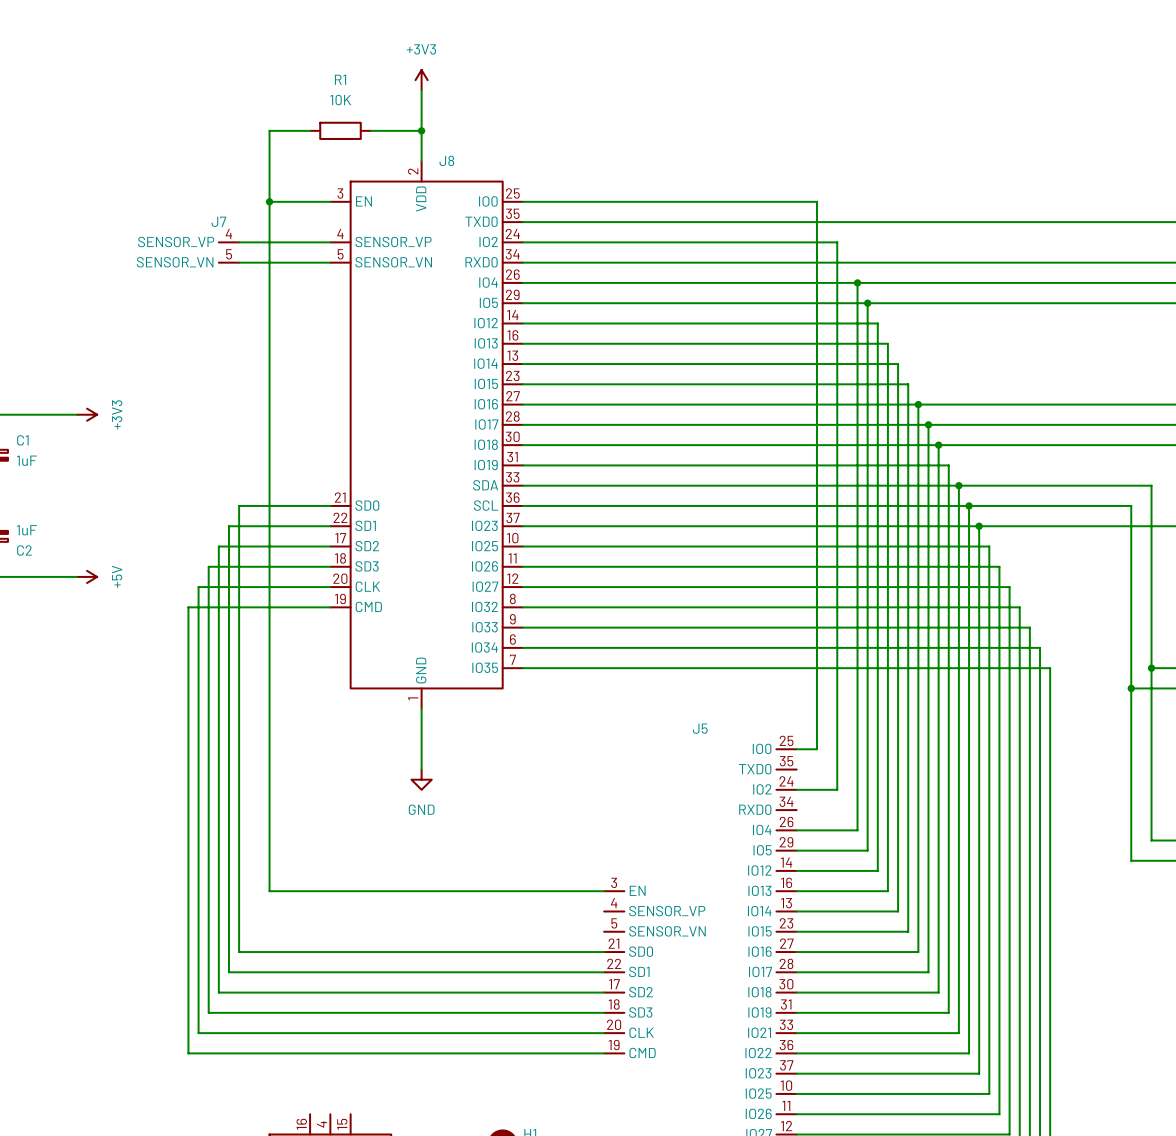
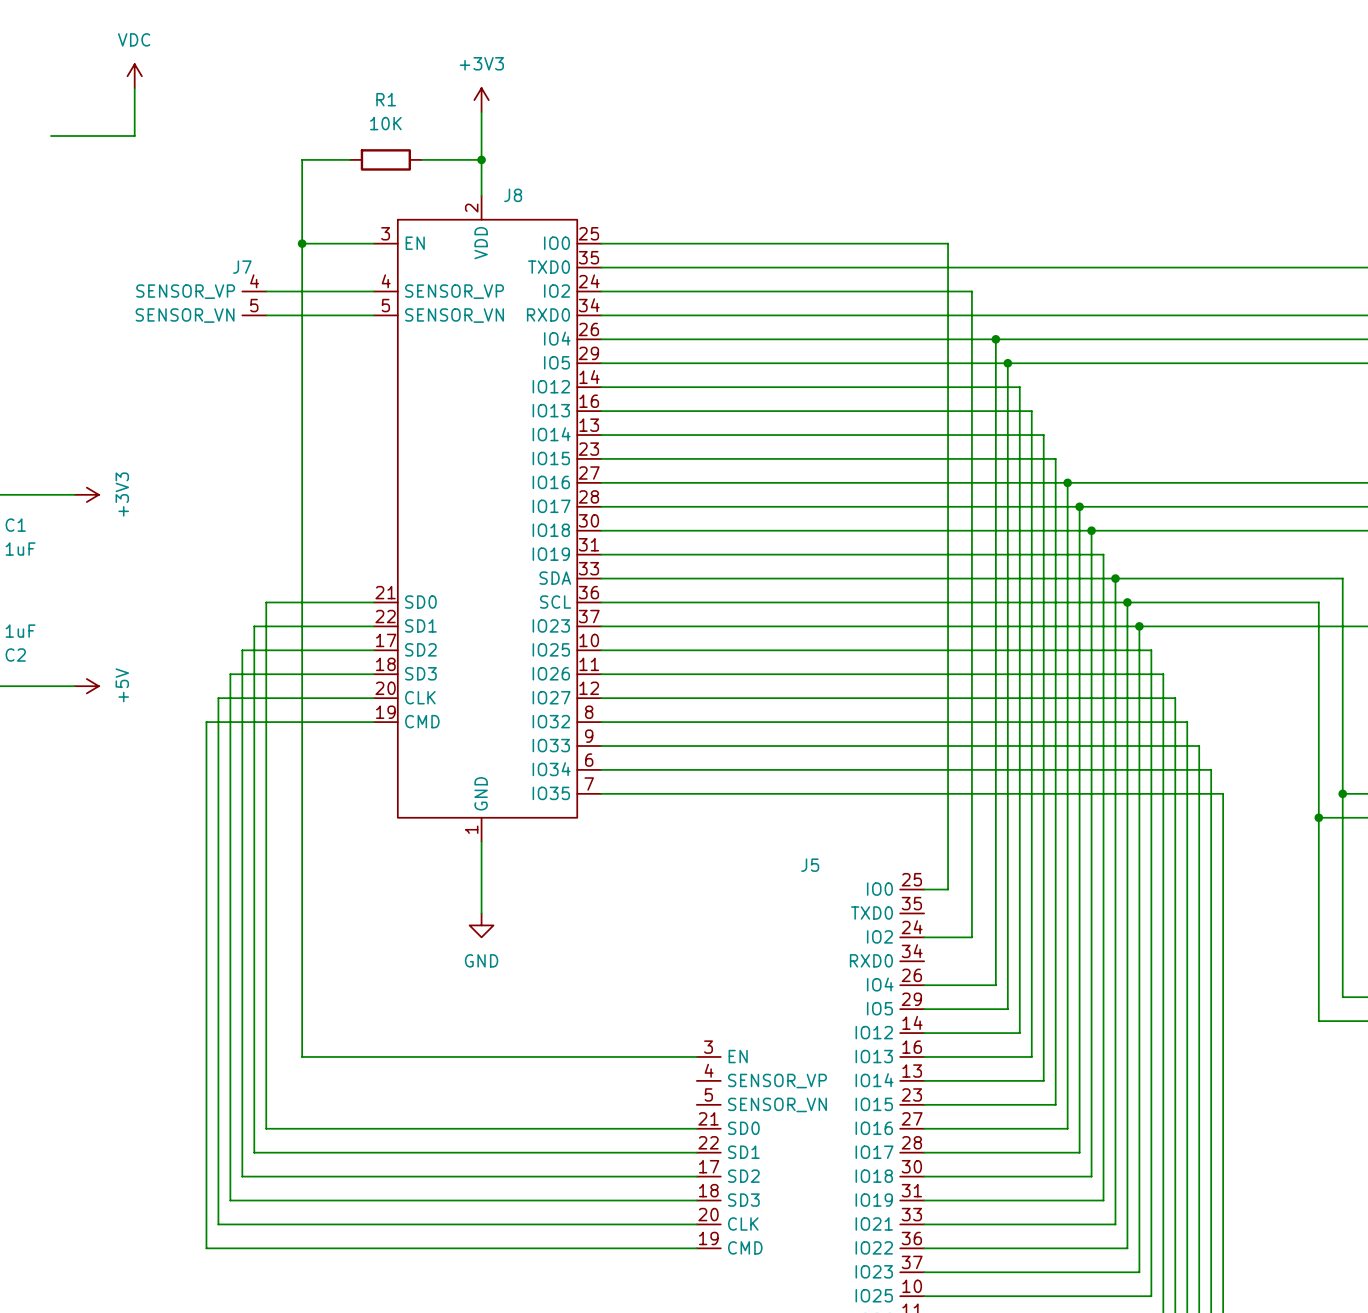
power symbol: none -> VDC (134, 76)
wire: none -> (134, 88) (134, 136) (50, 136)

